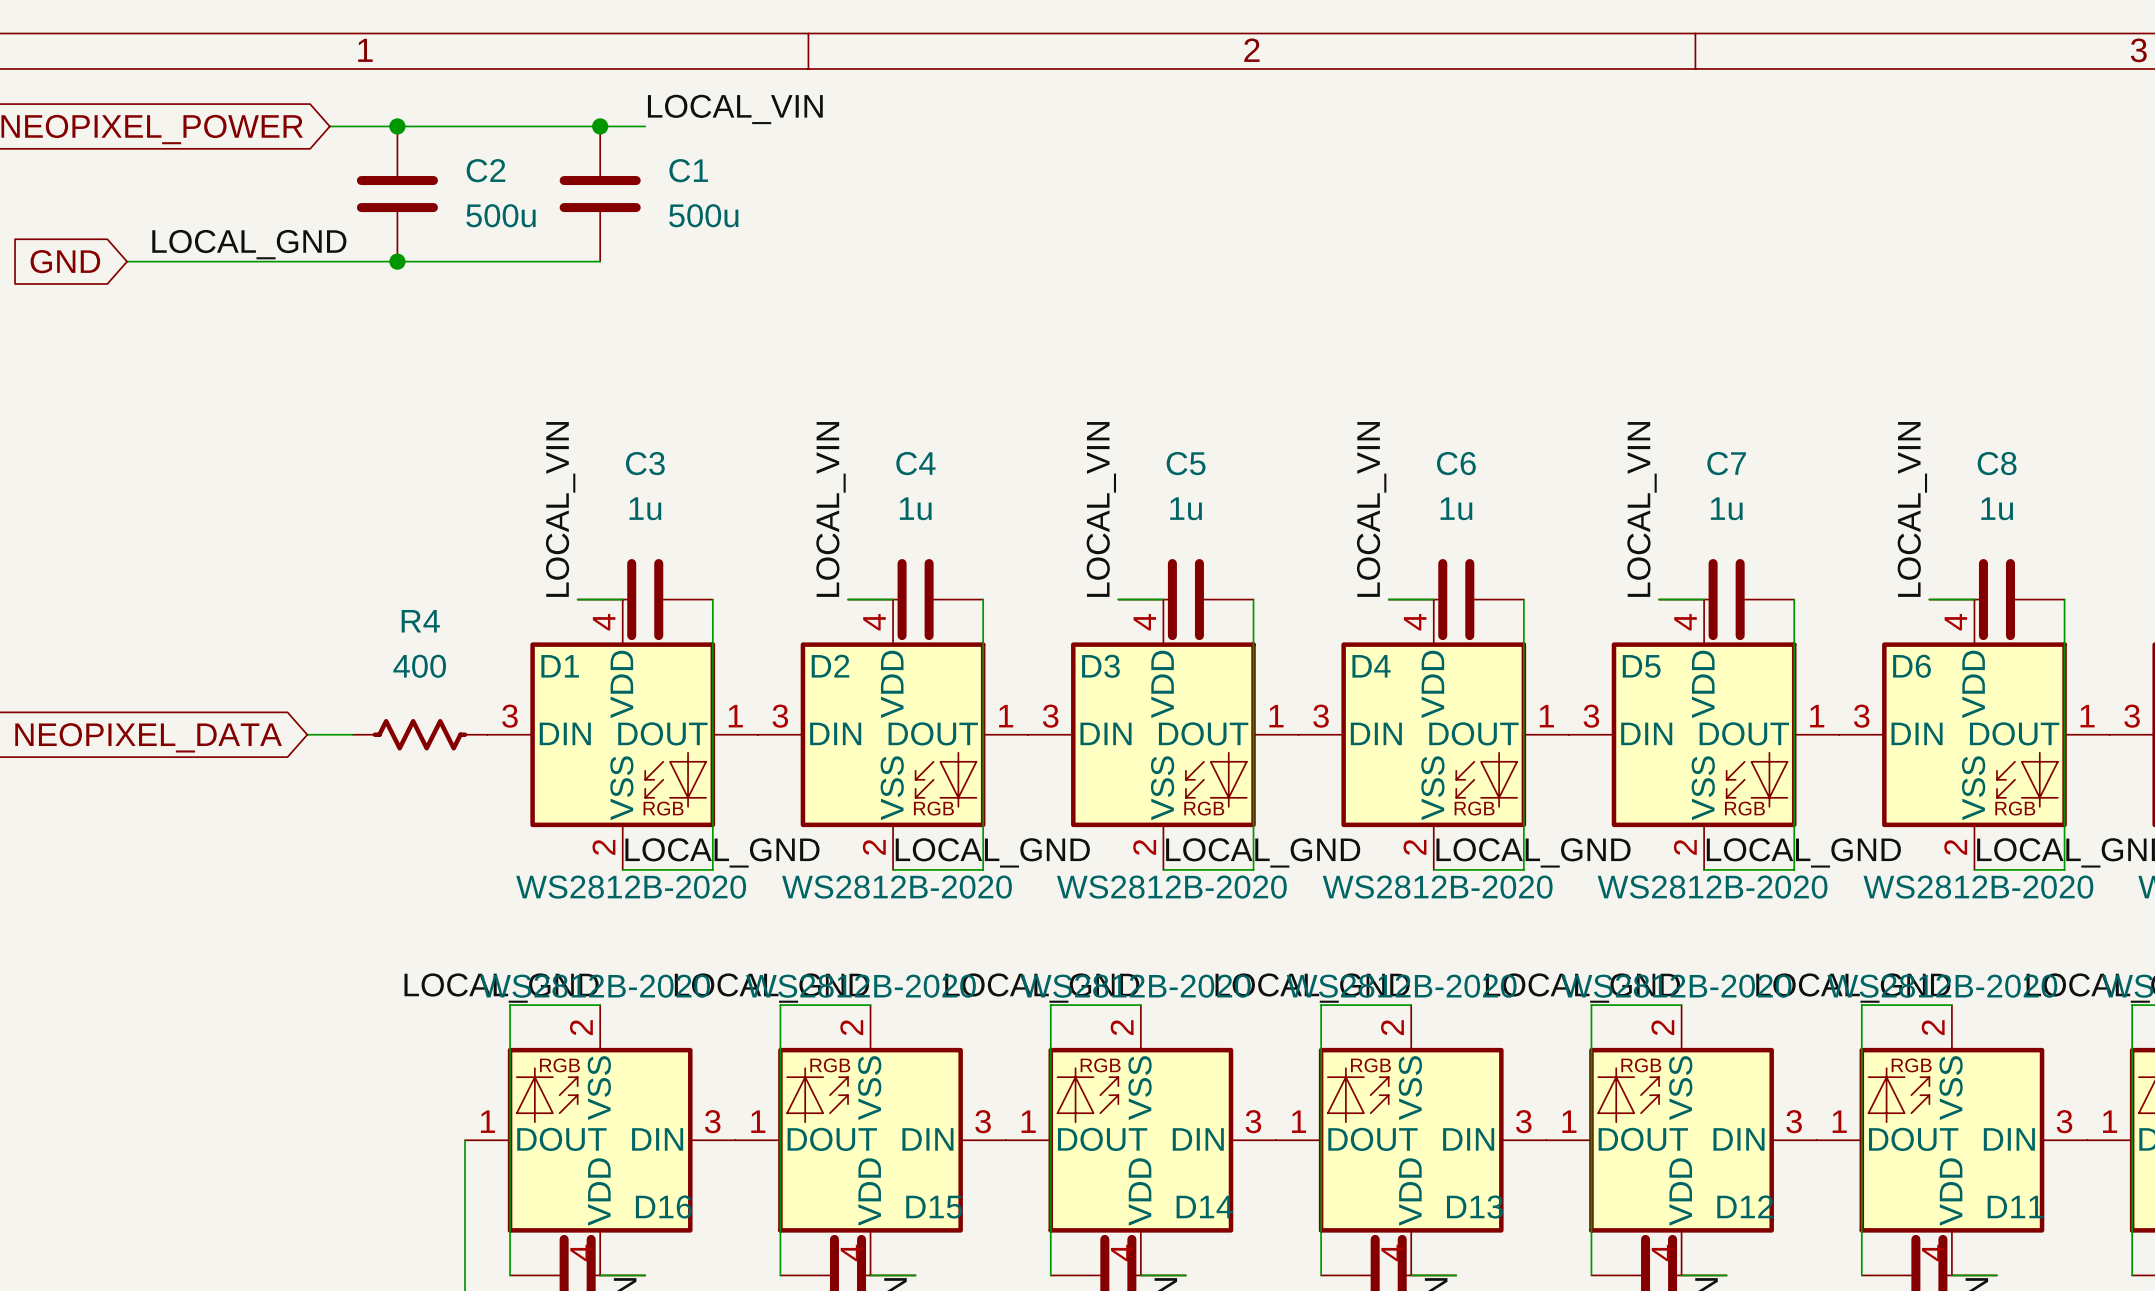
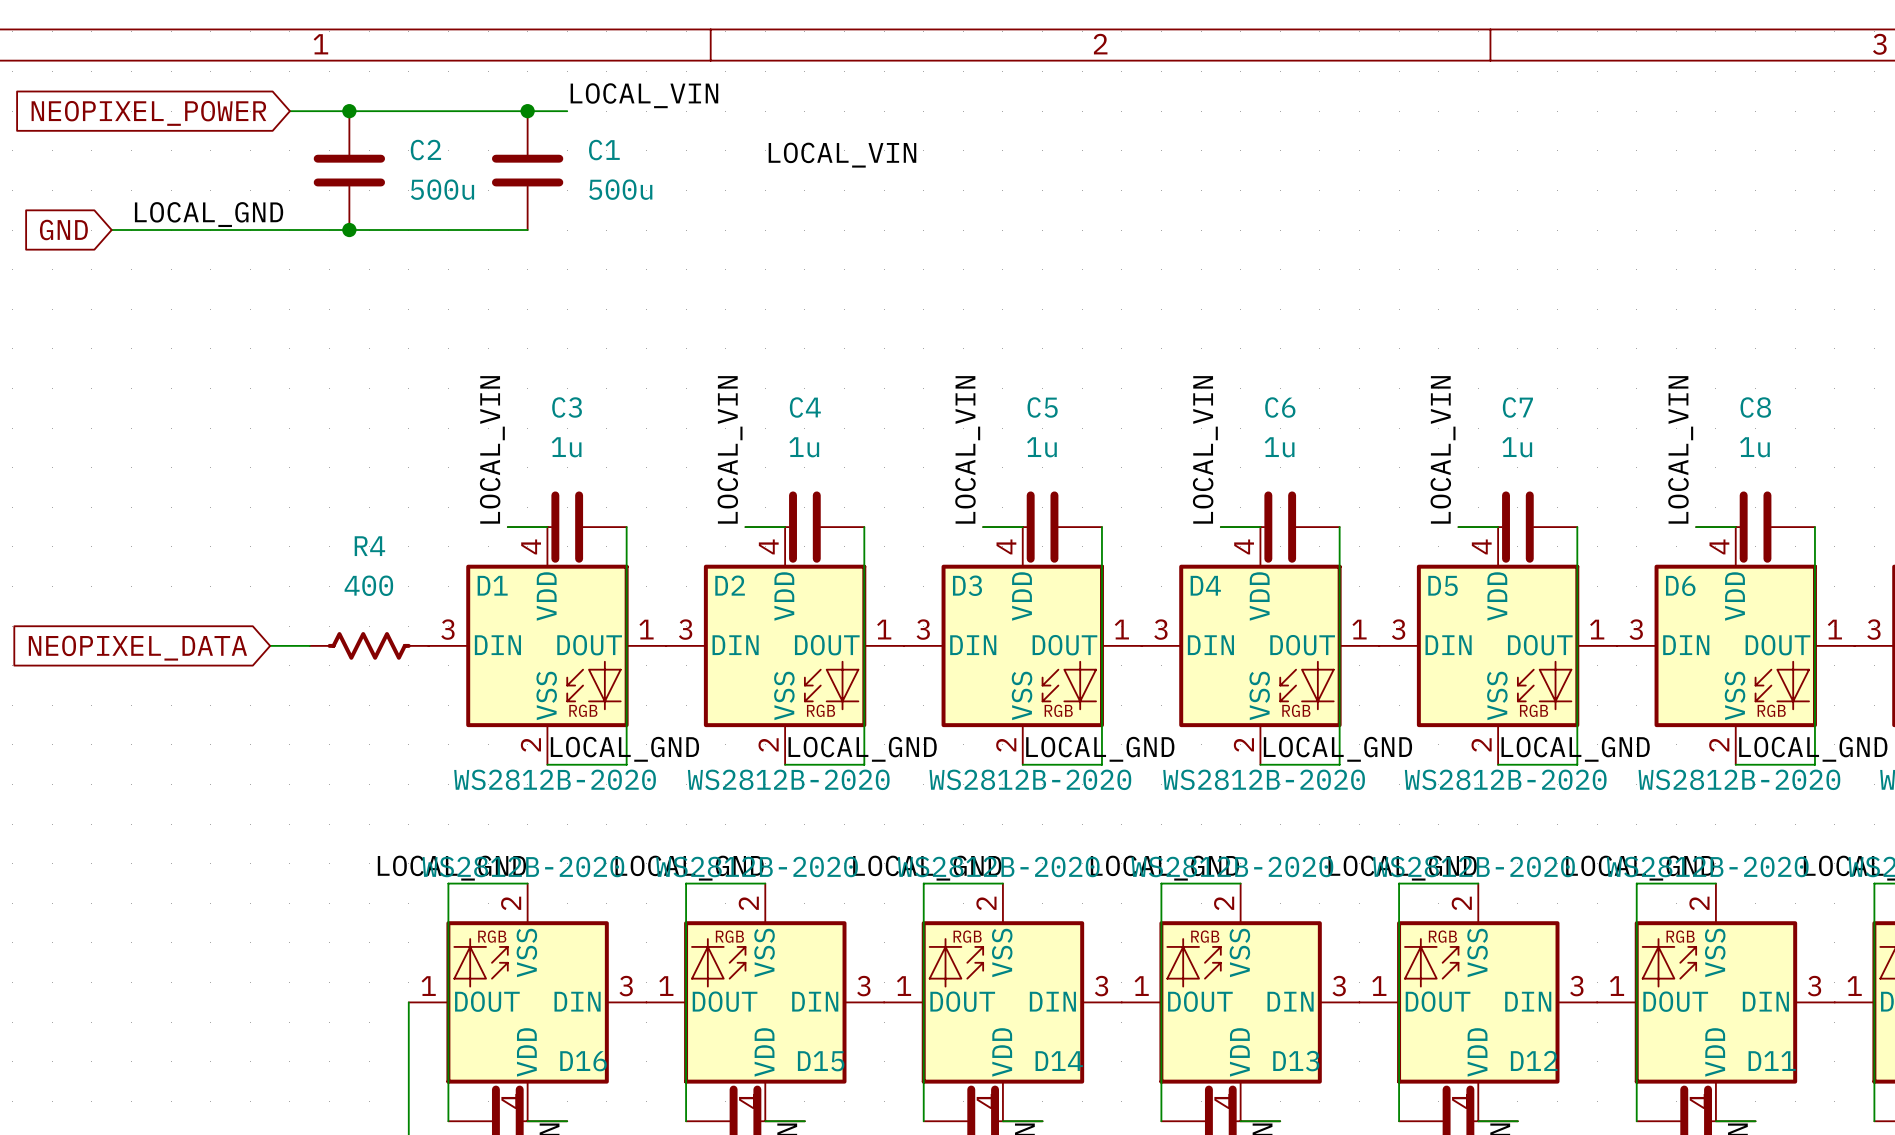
label: none -> LOCAL_VIN (842, 155)

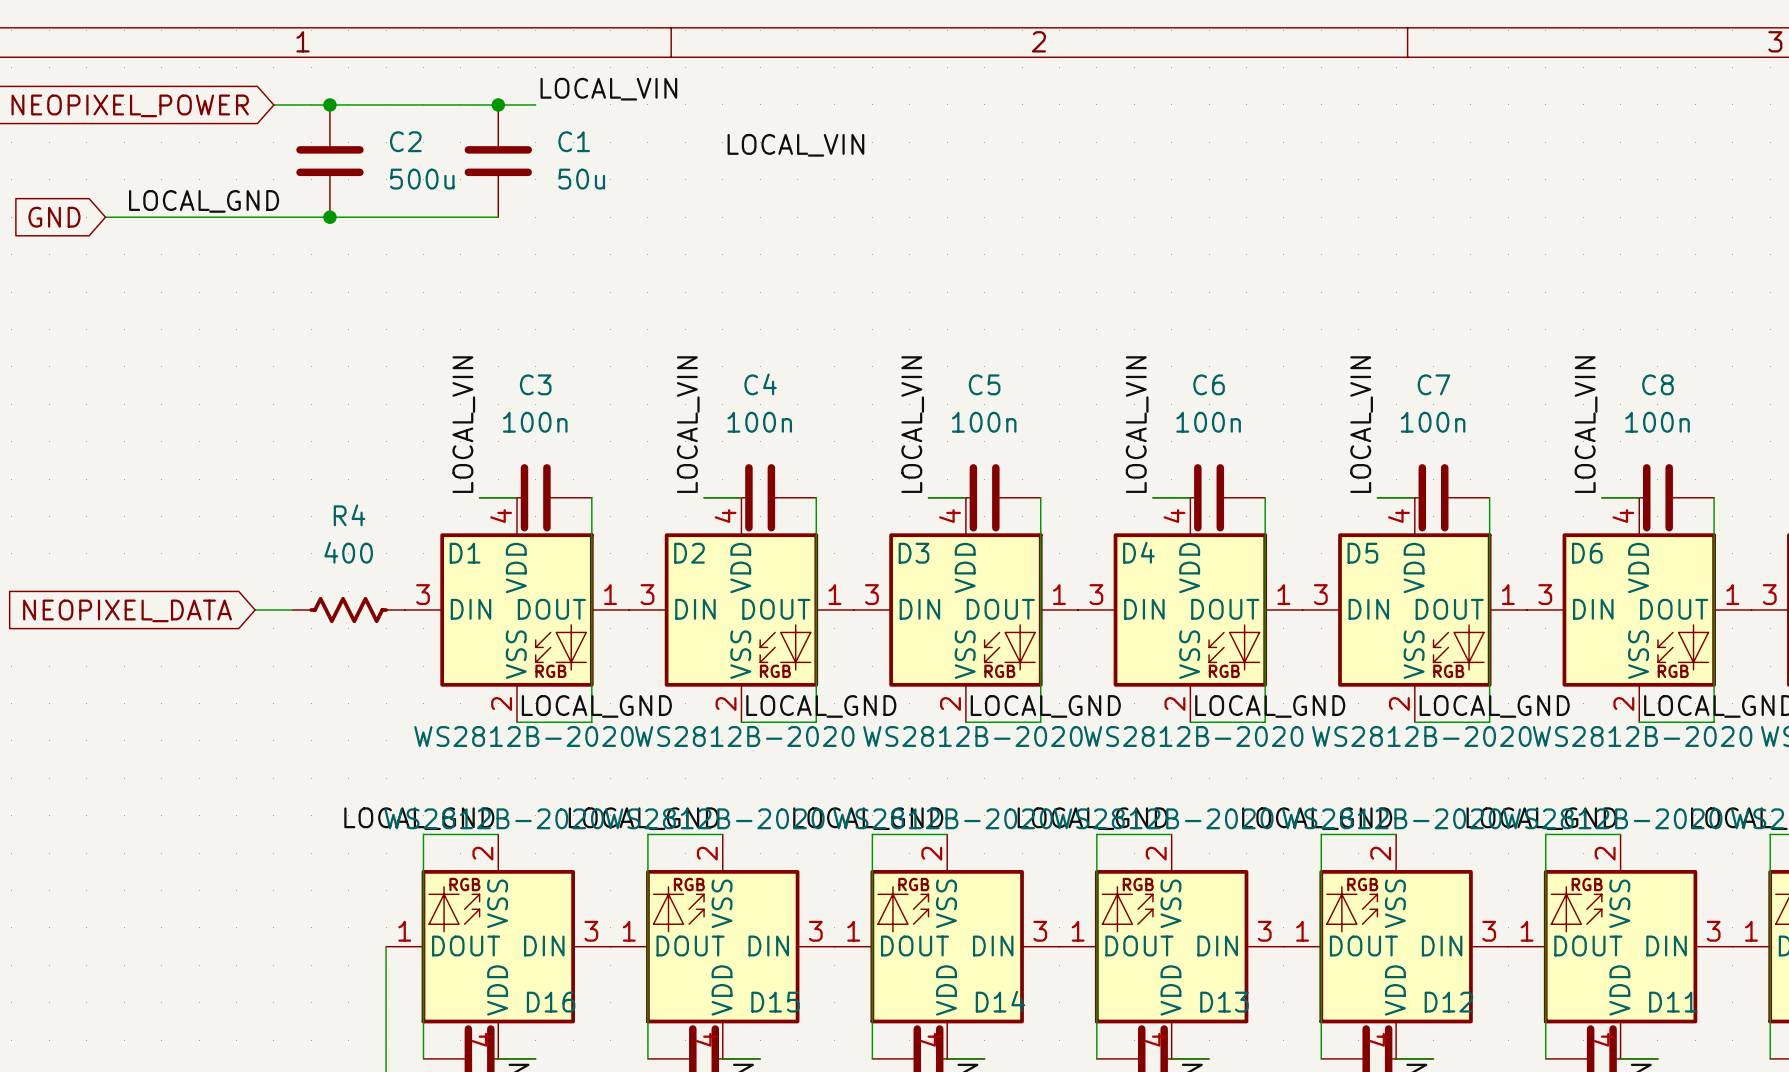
C1 value: 500u (620, 189) -> 50u (581, 179)
C3 value: 1u (566, 447) -> 100n (535, 422)
C4 value: 1u (804, 447) -> 100n (759, 422)
C5 value: 1u (1041, 447) -> 100n (984, 422)
C6 value: 1u (1279, 447) -> 100n (1208, 422)
C7 value: 1u (1517, 447) -> 100n (1433, 422)
C8 value: 1u (1754, 447) -> 100n (1657, 422)

